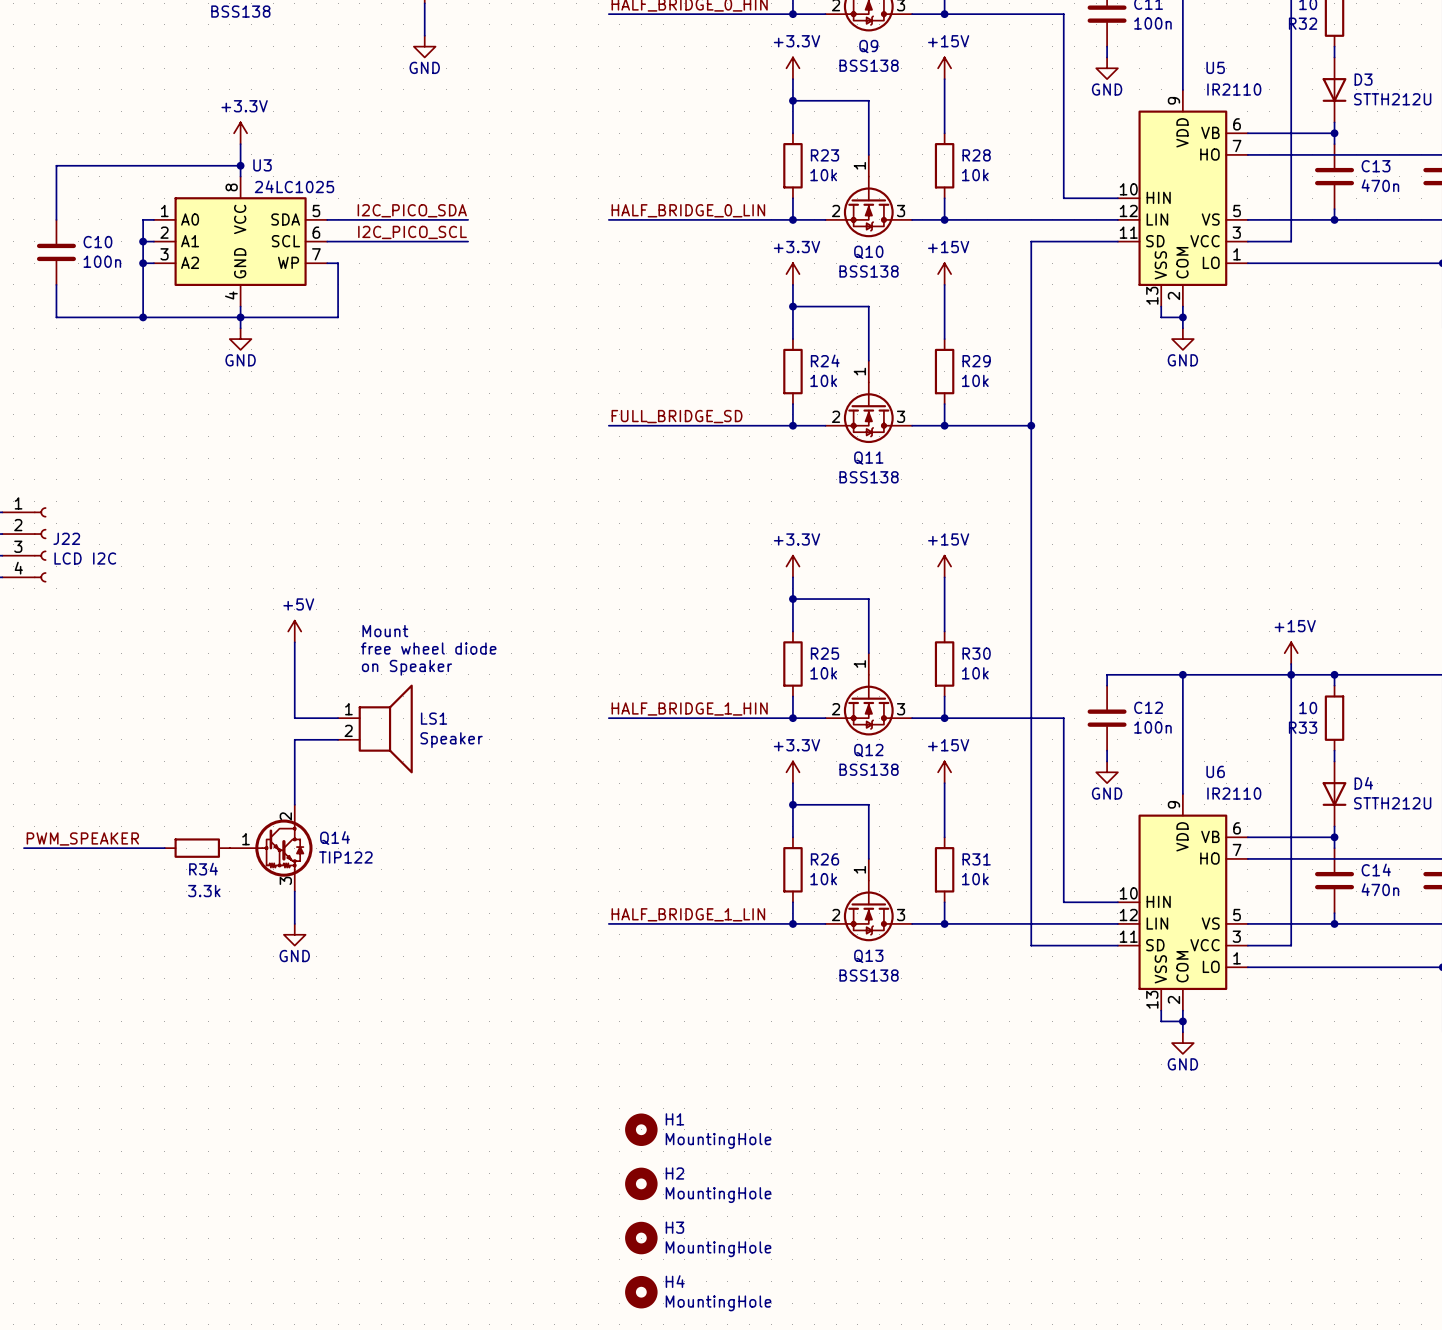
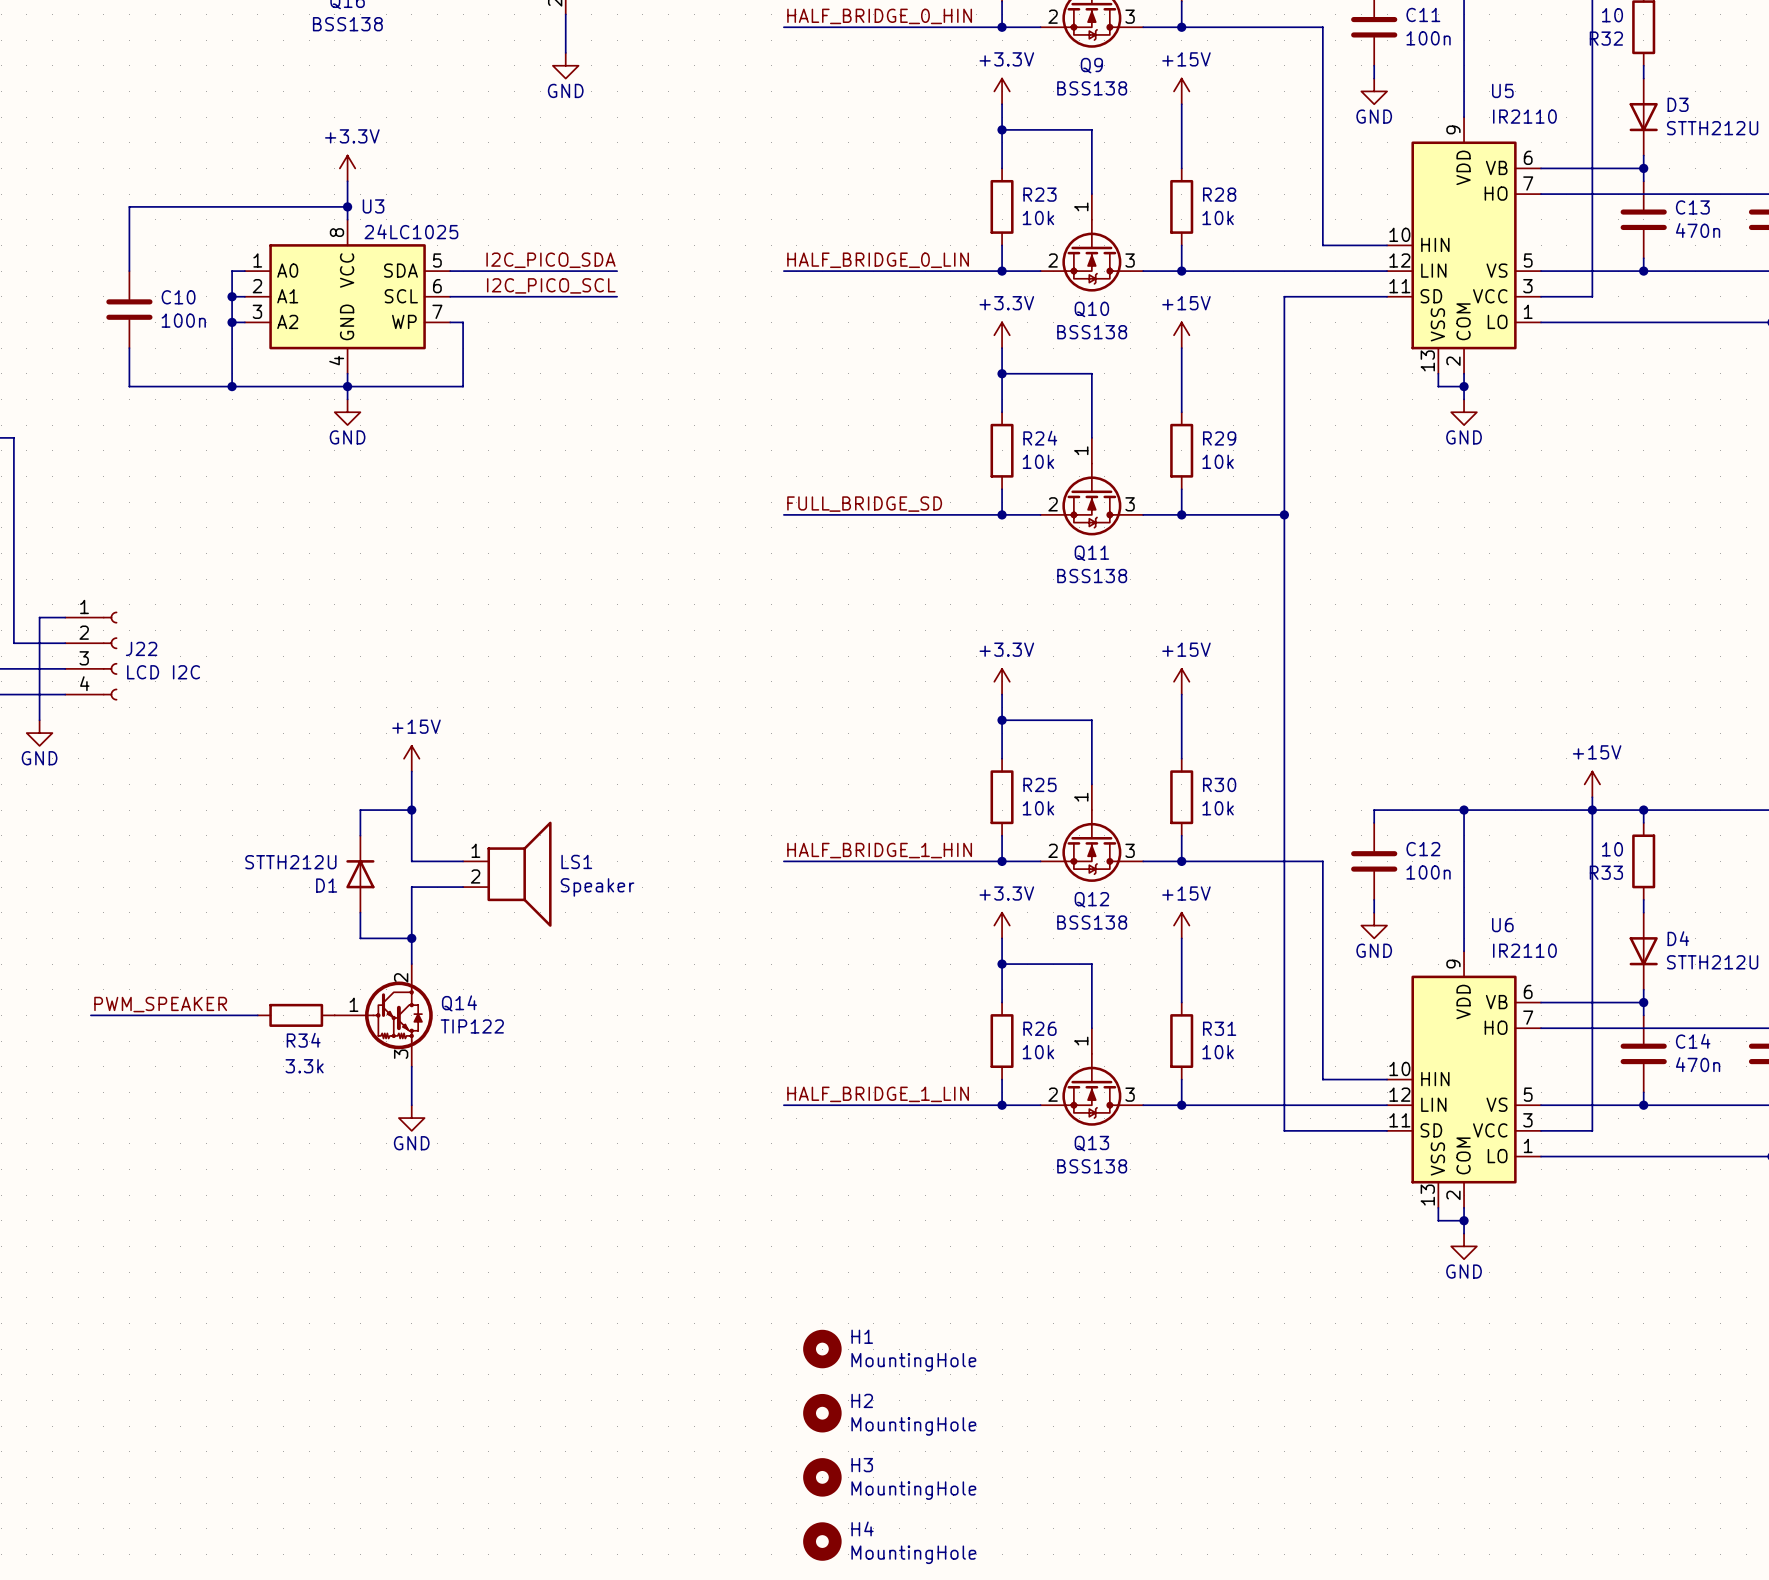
power symbol: +5V (294, 631) -> +15V (411, 758)
text: Mount (385, 631) -> none
text: free wheel diode (428, 648) -> none
text: on Speaker (407, 667) -> none
wire: none -> (411, 810) (360, 810) (360, 835)
junction: none -> (411, 810)
D1: none -> STTH212U (360, 874)
wire: none -> (360, 912) (360, 938) (411, 938)
junction: none -> (411, 938)

